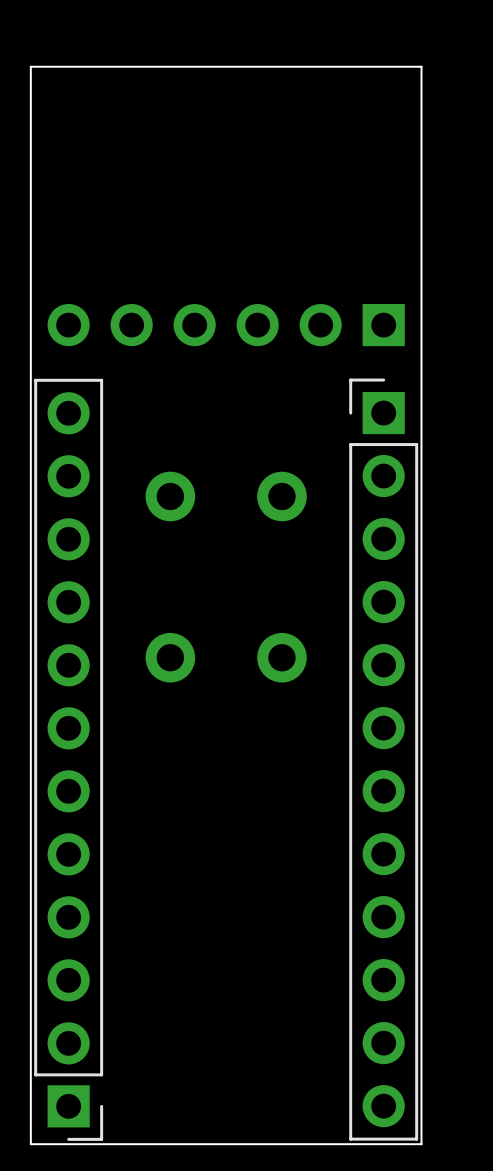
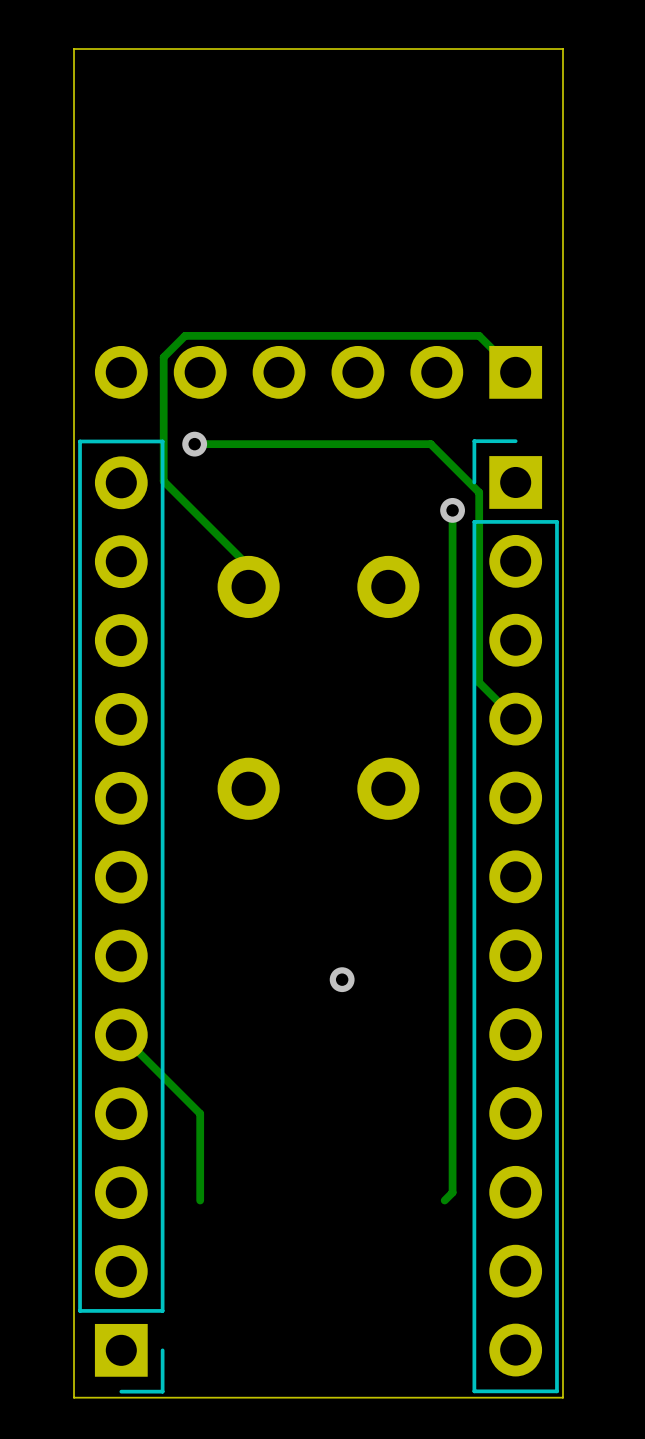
track: none -> (515, 372) (479, 335) (185, 335) (163, 357) (163, 481) (248, 566)
track: none -> (194, 444) (430, 444) (479, 492) (479, 682) (515, 719)
via: none -> (194, 444)
track: none -> (452, 510) (452, 1192) (444, 1200)
via: none -> (452, 510)
via: none -> (342, 979)
track: none -> (121, 1034) (200, 1113) (200, 1200)

